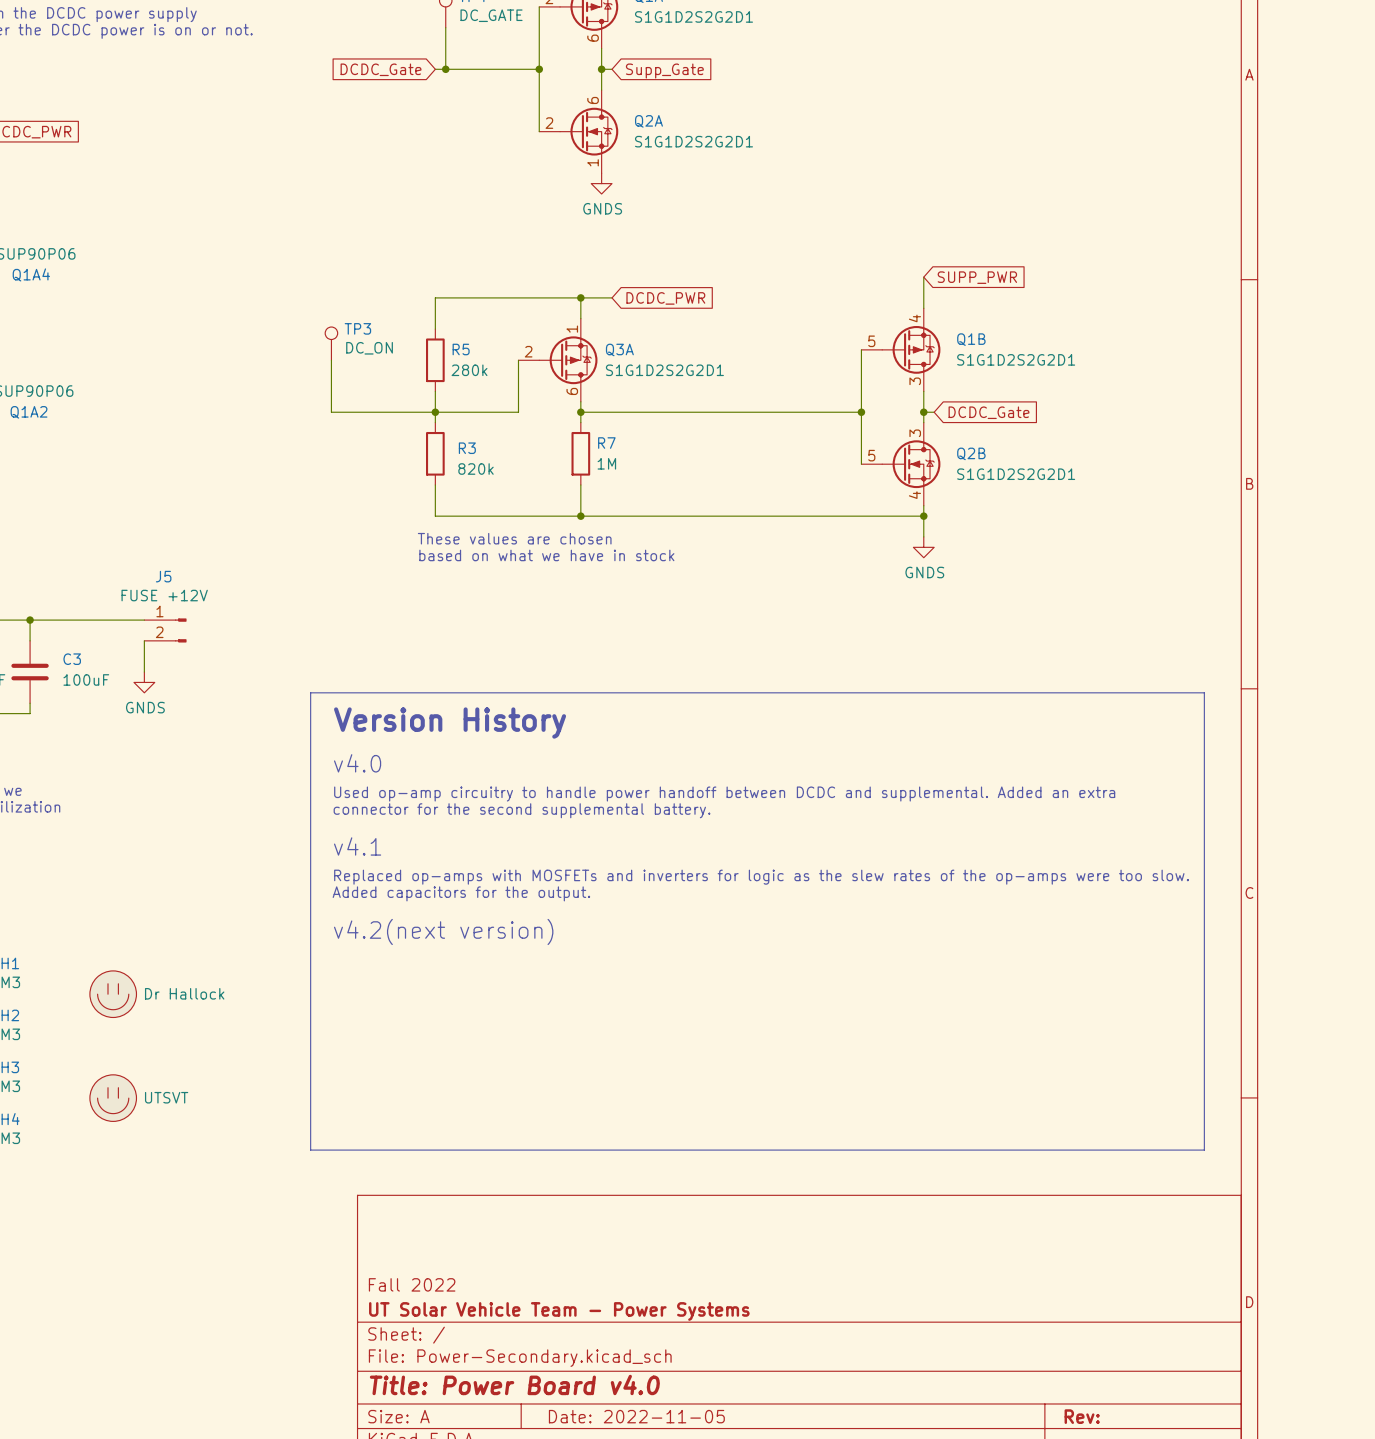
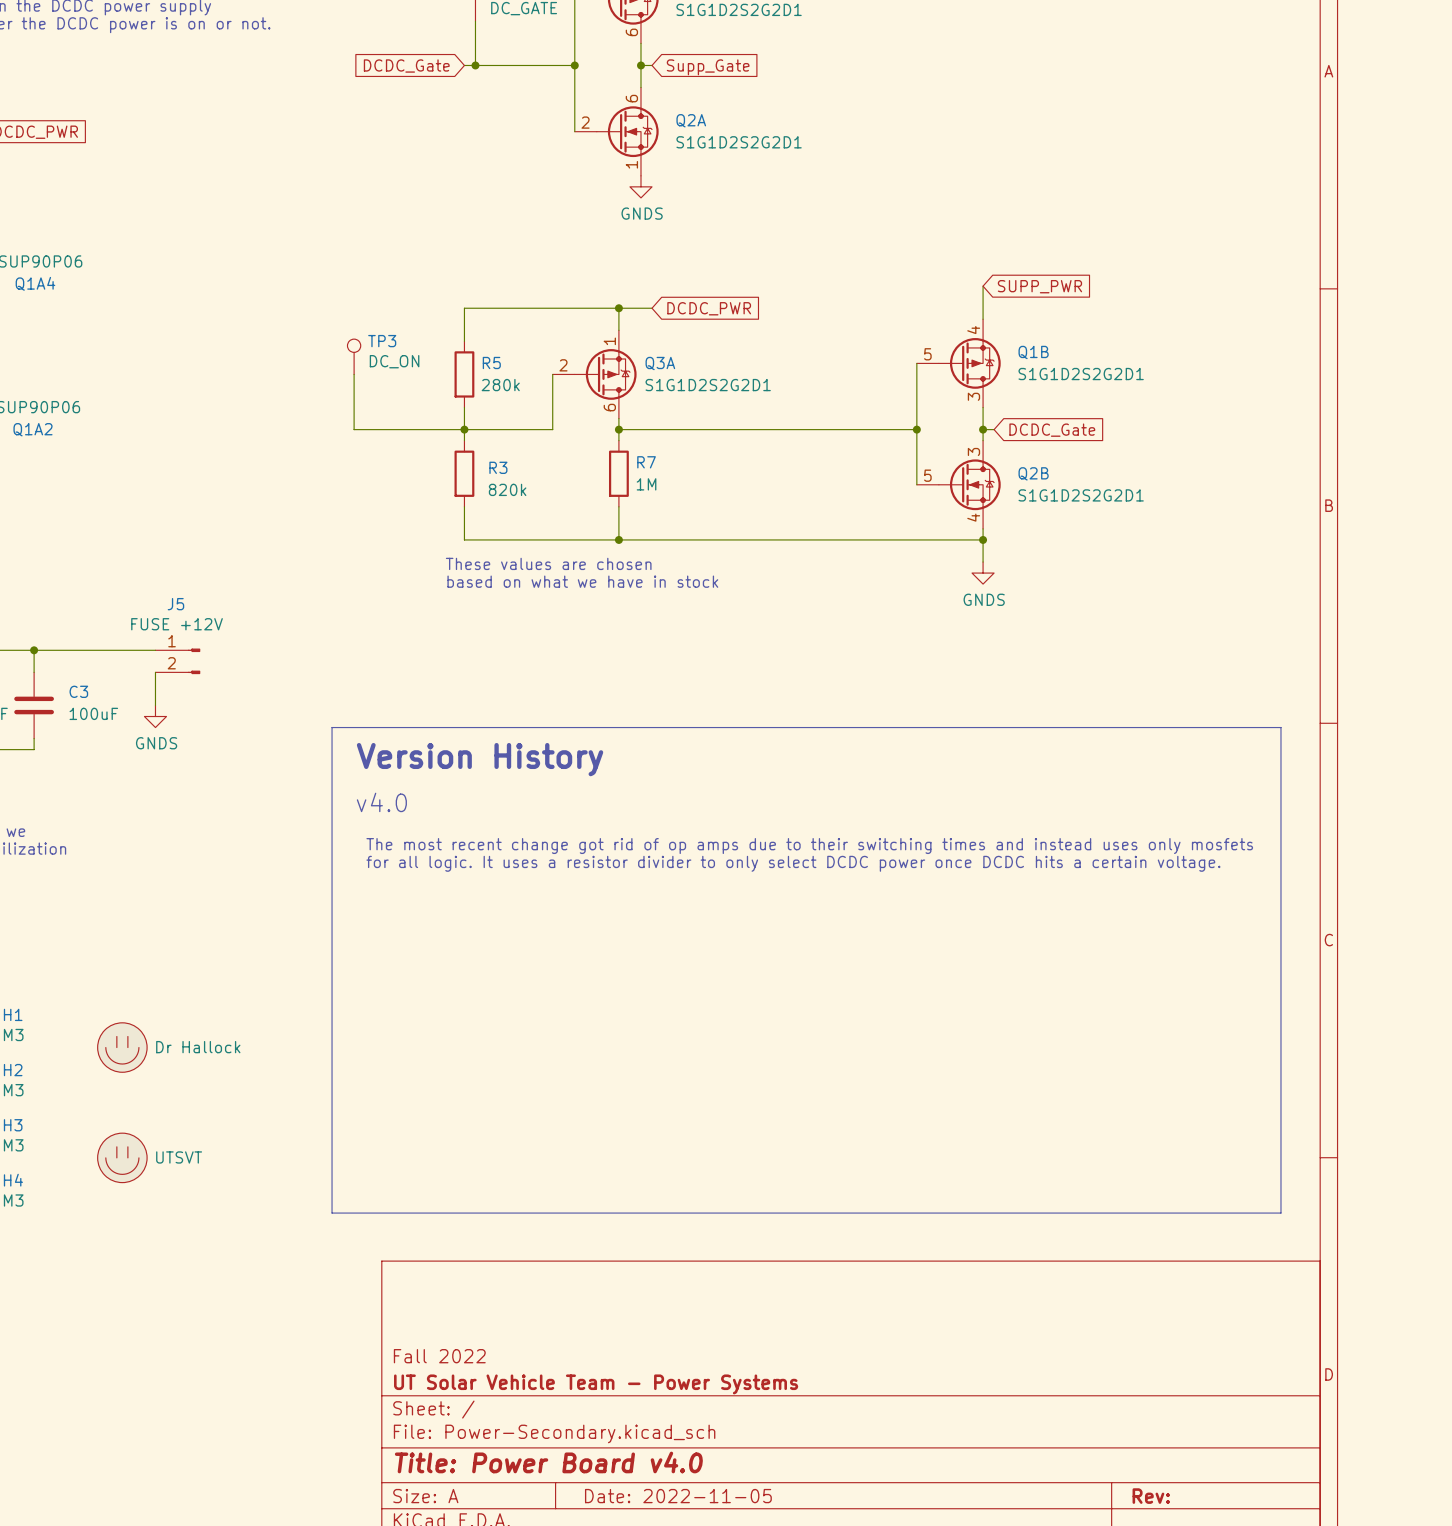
text: Used op-amp circuitry to handle power handoff between DCDC and supplemental. Added an extra (724, 794) -> none
text: none -> The most recent change got rid of op amps due to their switching times and instead uses only mosfets (809, 846)
text: connector for the second supplemental battery. (522, 810) -> none
text: none -> for all logic. It uses a resistor divider to only select DCDC power once DCDC hits a certain voltage. (793, 863)
text: v4.1 (357, 846) -> none
text: Replaced op-amps with MOSFETs and inverters for logic as the slew rates of the op-amps were too slow. (761, 877) -> none
text: Added capacitors for the output. (461, 893) -> none
text: v4.2(next version) (443, 931) -> none

